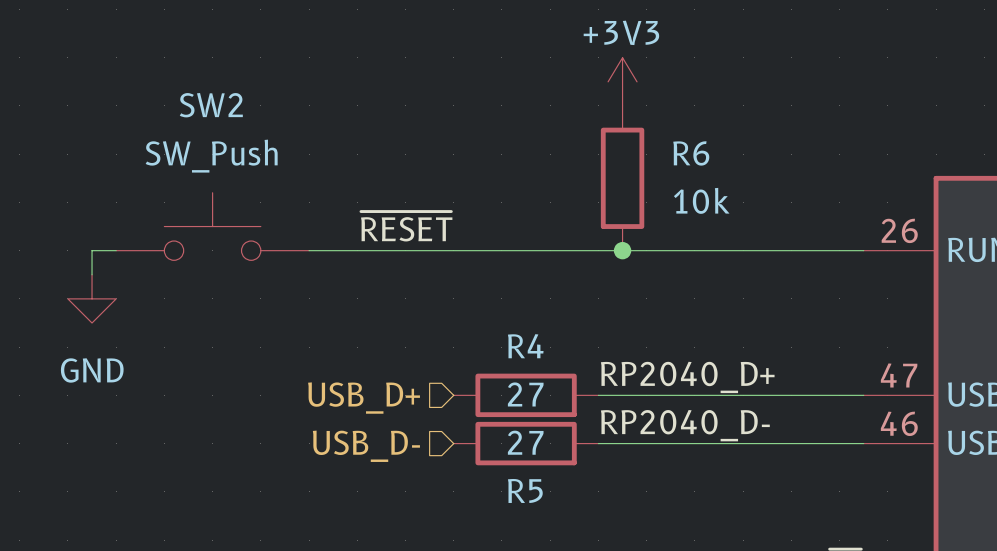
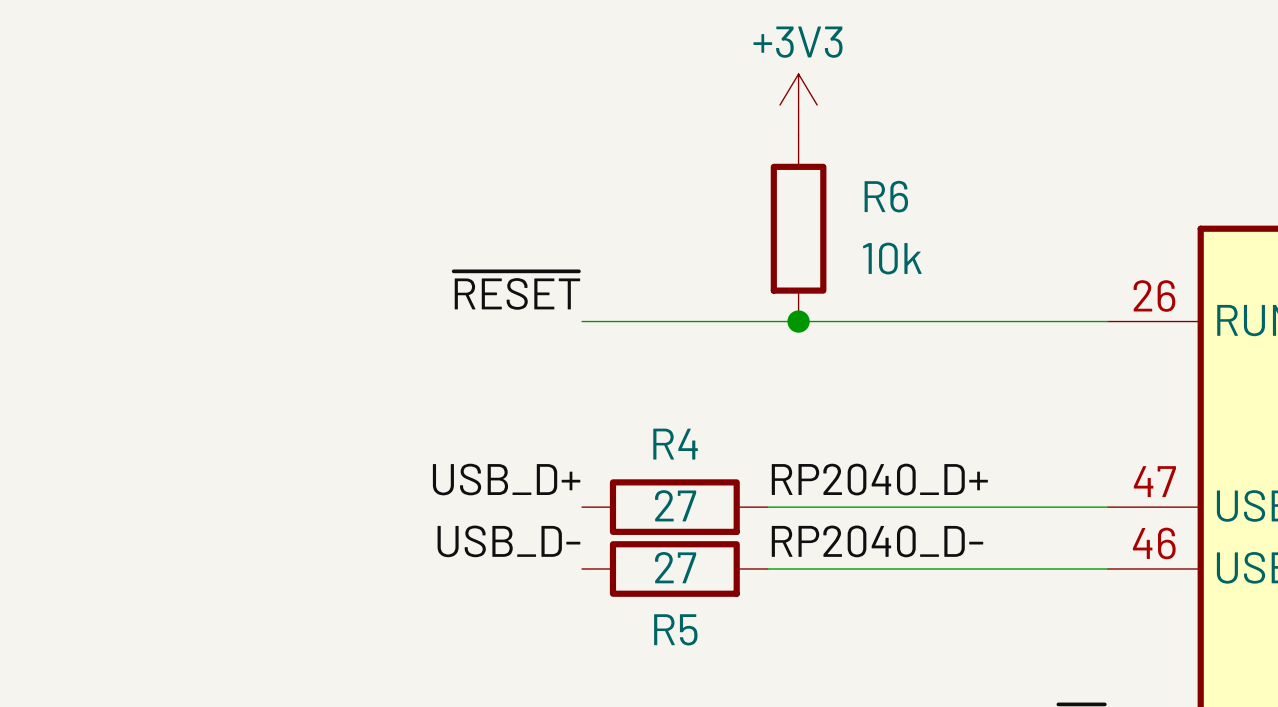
SW2: SW_Push (212, 226) -> none
wire: (116, 250) (92, 250) (92, 274) -> none
wire: (309, 250) (453, 250) -> none
power symbol: GND (92, 298) -> none
label: none -> USB_D+ (506, 479)
hierarchical label: USB_D+ (364, 398) -> none
label: none -> USB_D- (508, 541)
hierarchical label: USB_D- (366, 446) -> none

